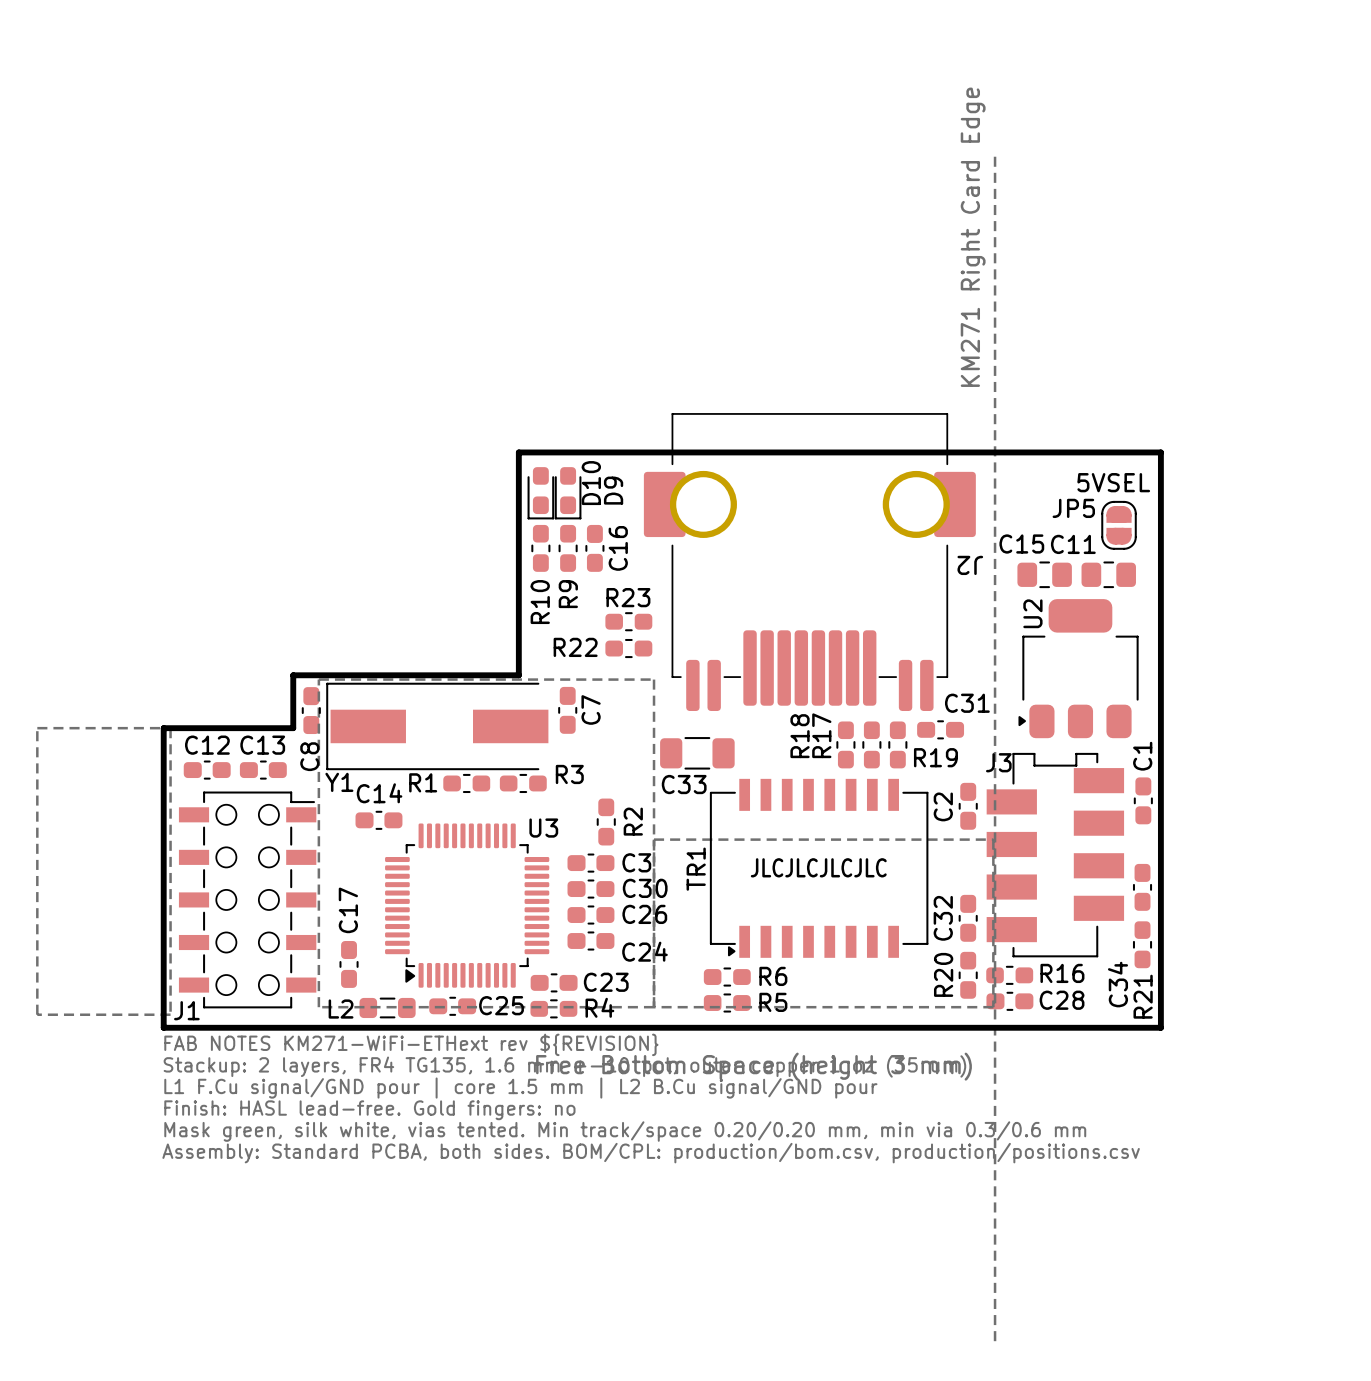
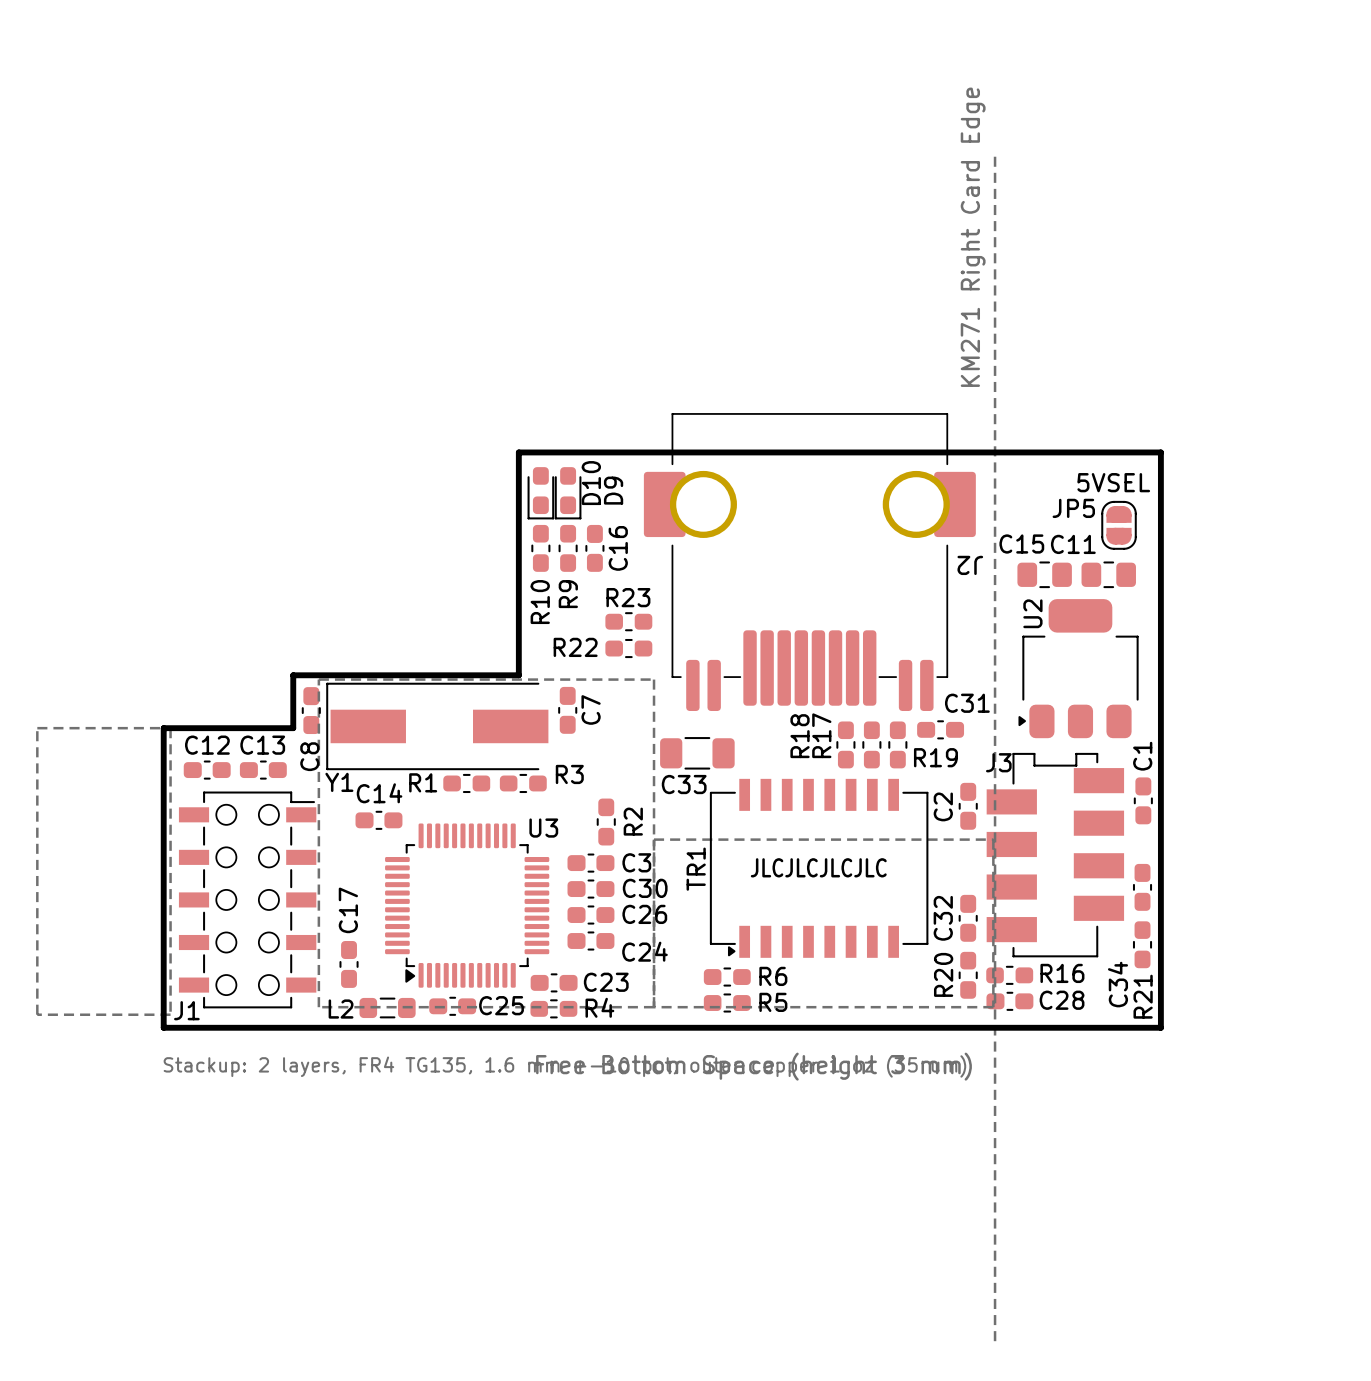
text: FAB NOTES KM271-WiFi-ETHext rev ${REVISION} (411, 1044) -> none
text: L1 F.Cu signal/GND pour | core 1.5 mm | L2 B.Cu signal/GND pour (520, 1088) -> none
text: Finish: HASL lead-free. Gold fingers: no (369, 1110) -> none
text: Mask green, silk white, vias tented. Min track/space 0.20/0.20 mm, min via 0.3/0.6 mm (625, 1131) -> none
text: Assembly: Standard PCBA, both sides. BOM/CPL: production/bom.csv, production/positions.csv (651, 1153) -> none

